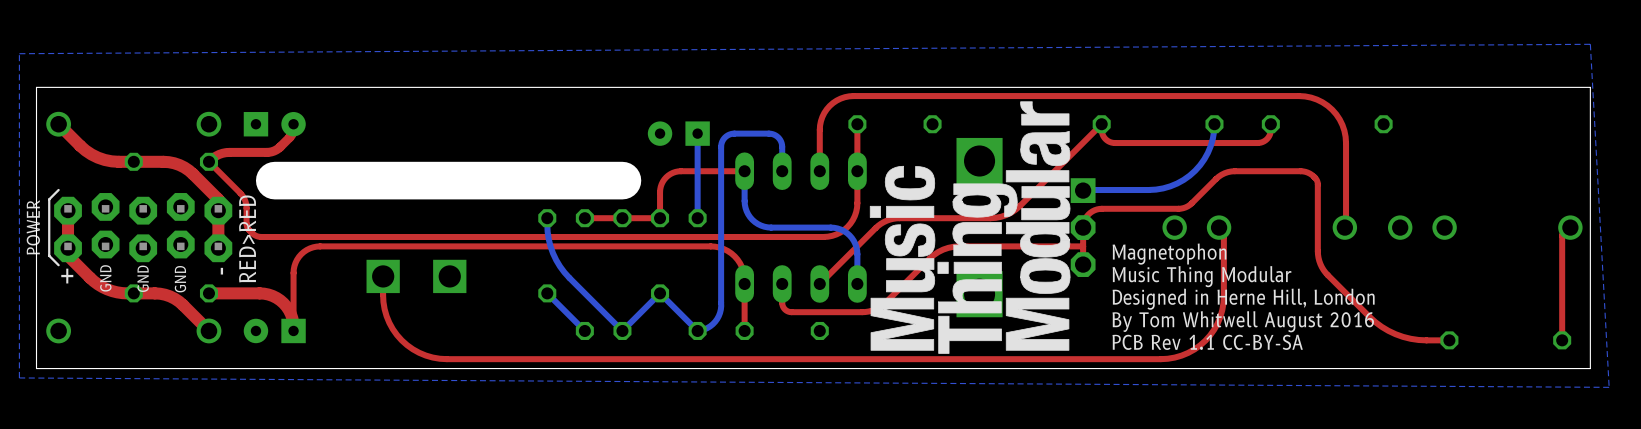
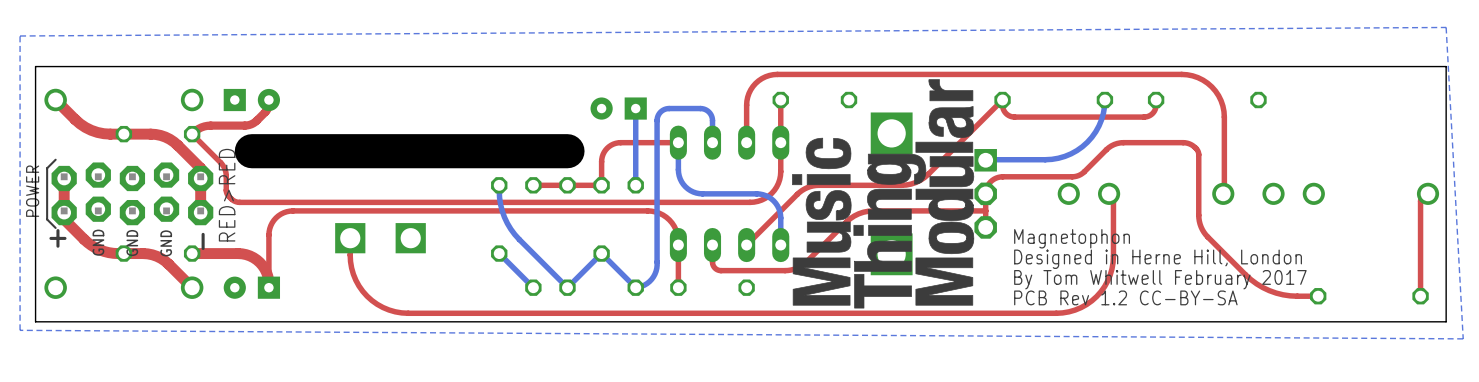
text: Magnetophon (1169, 254) -> none
text: Music Thing Modular (1202, 276) -> Magnetophon (1072, 238)
text: By Tom Whitwell August 2016 (1243, 321) -> By Tom Whitwell February 2017 (1160, 279)
text: PCB Rev 1.1 CC-BY-SA (1207, 342) -> PCB Rev 1.2 CC-BY-SA (1125, 297)

